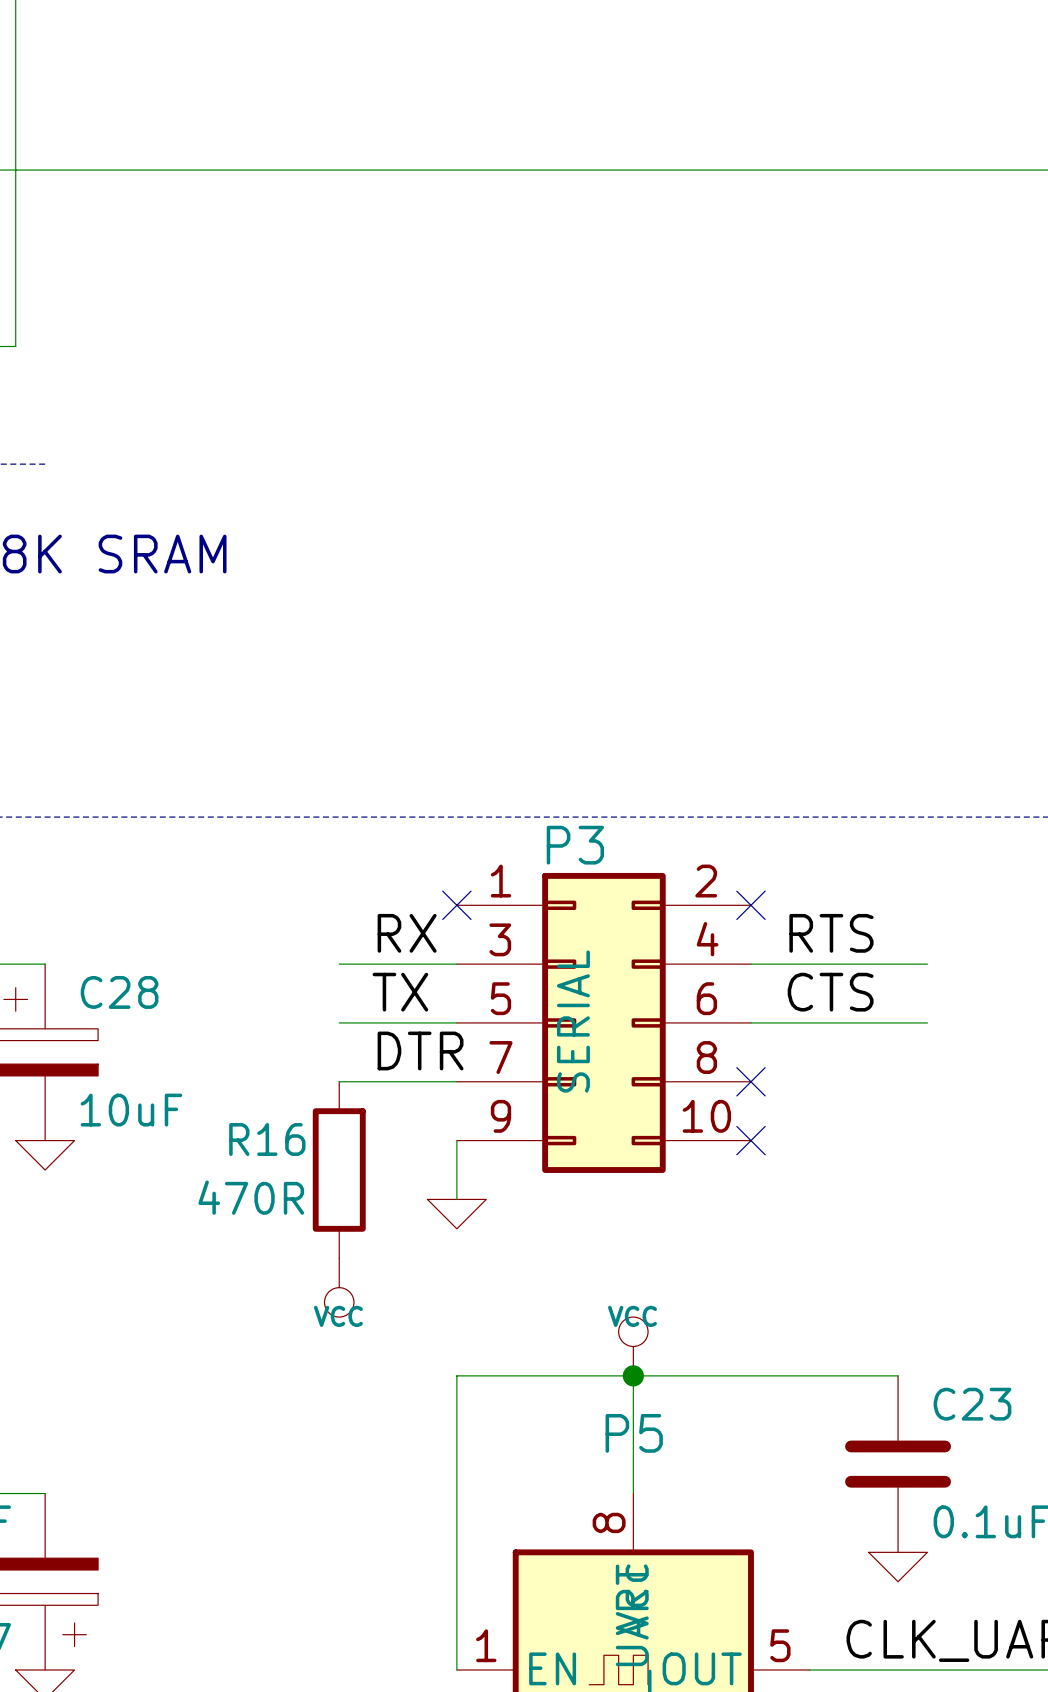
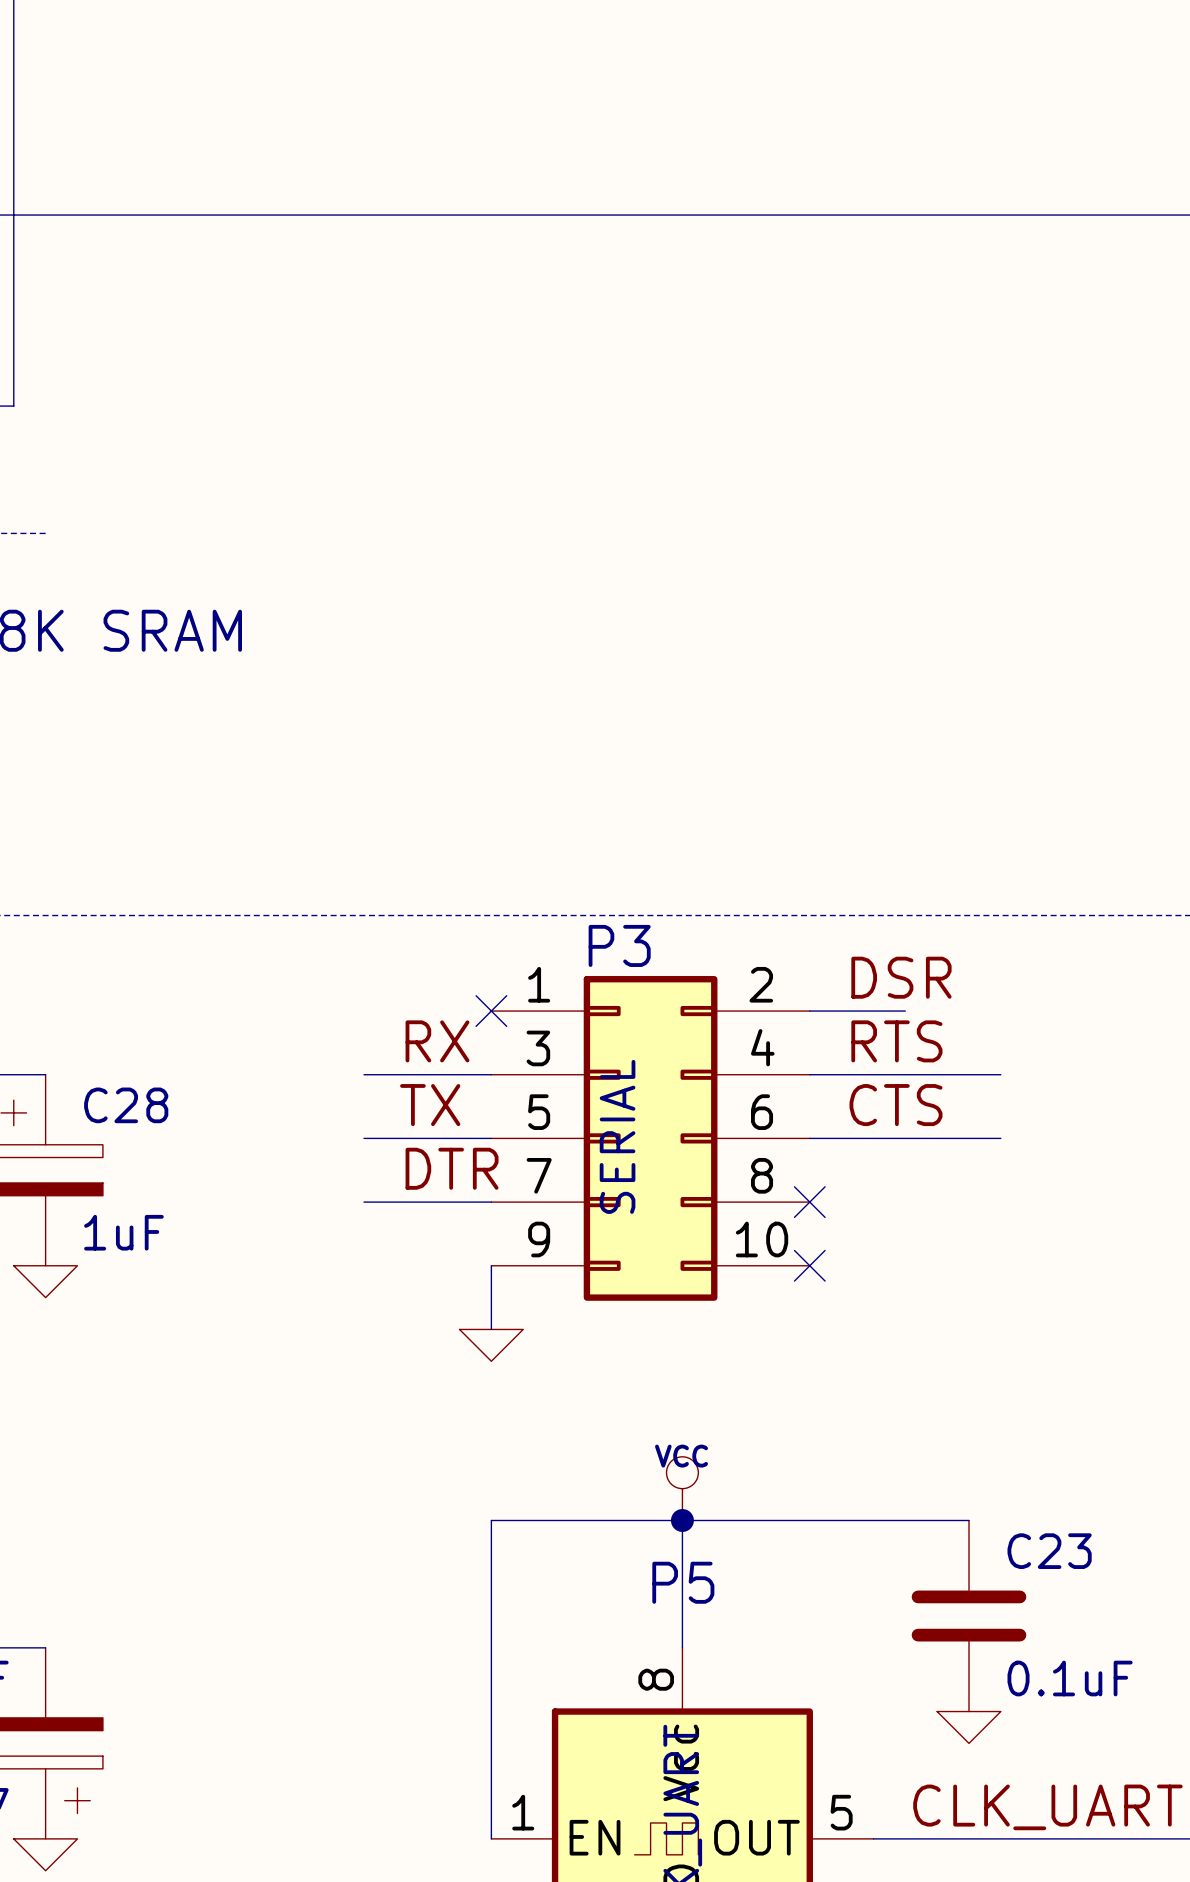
label: none -> DSR (901, 977)
wire: none -> (809, 1011) (905, 1011)
no-connect mark: (750, 905) -> none
C28 value: 10uF (131, 1110) -> 1uF (123, 1232)
R16: 470R (339, 1170) -> none
power symbol: VCC (339, 1287) -> none

